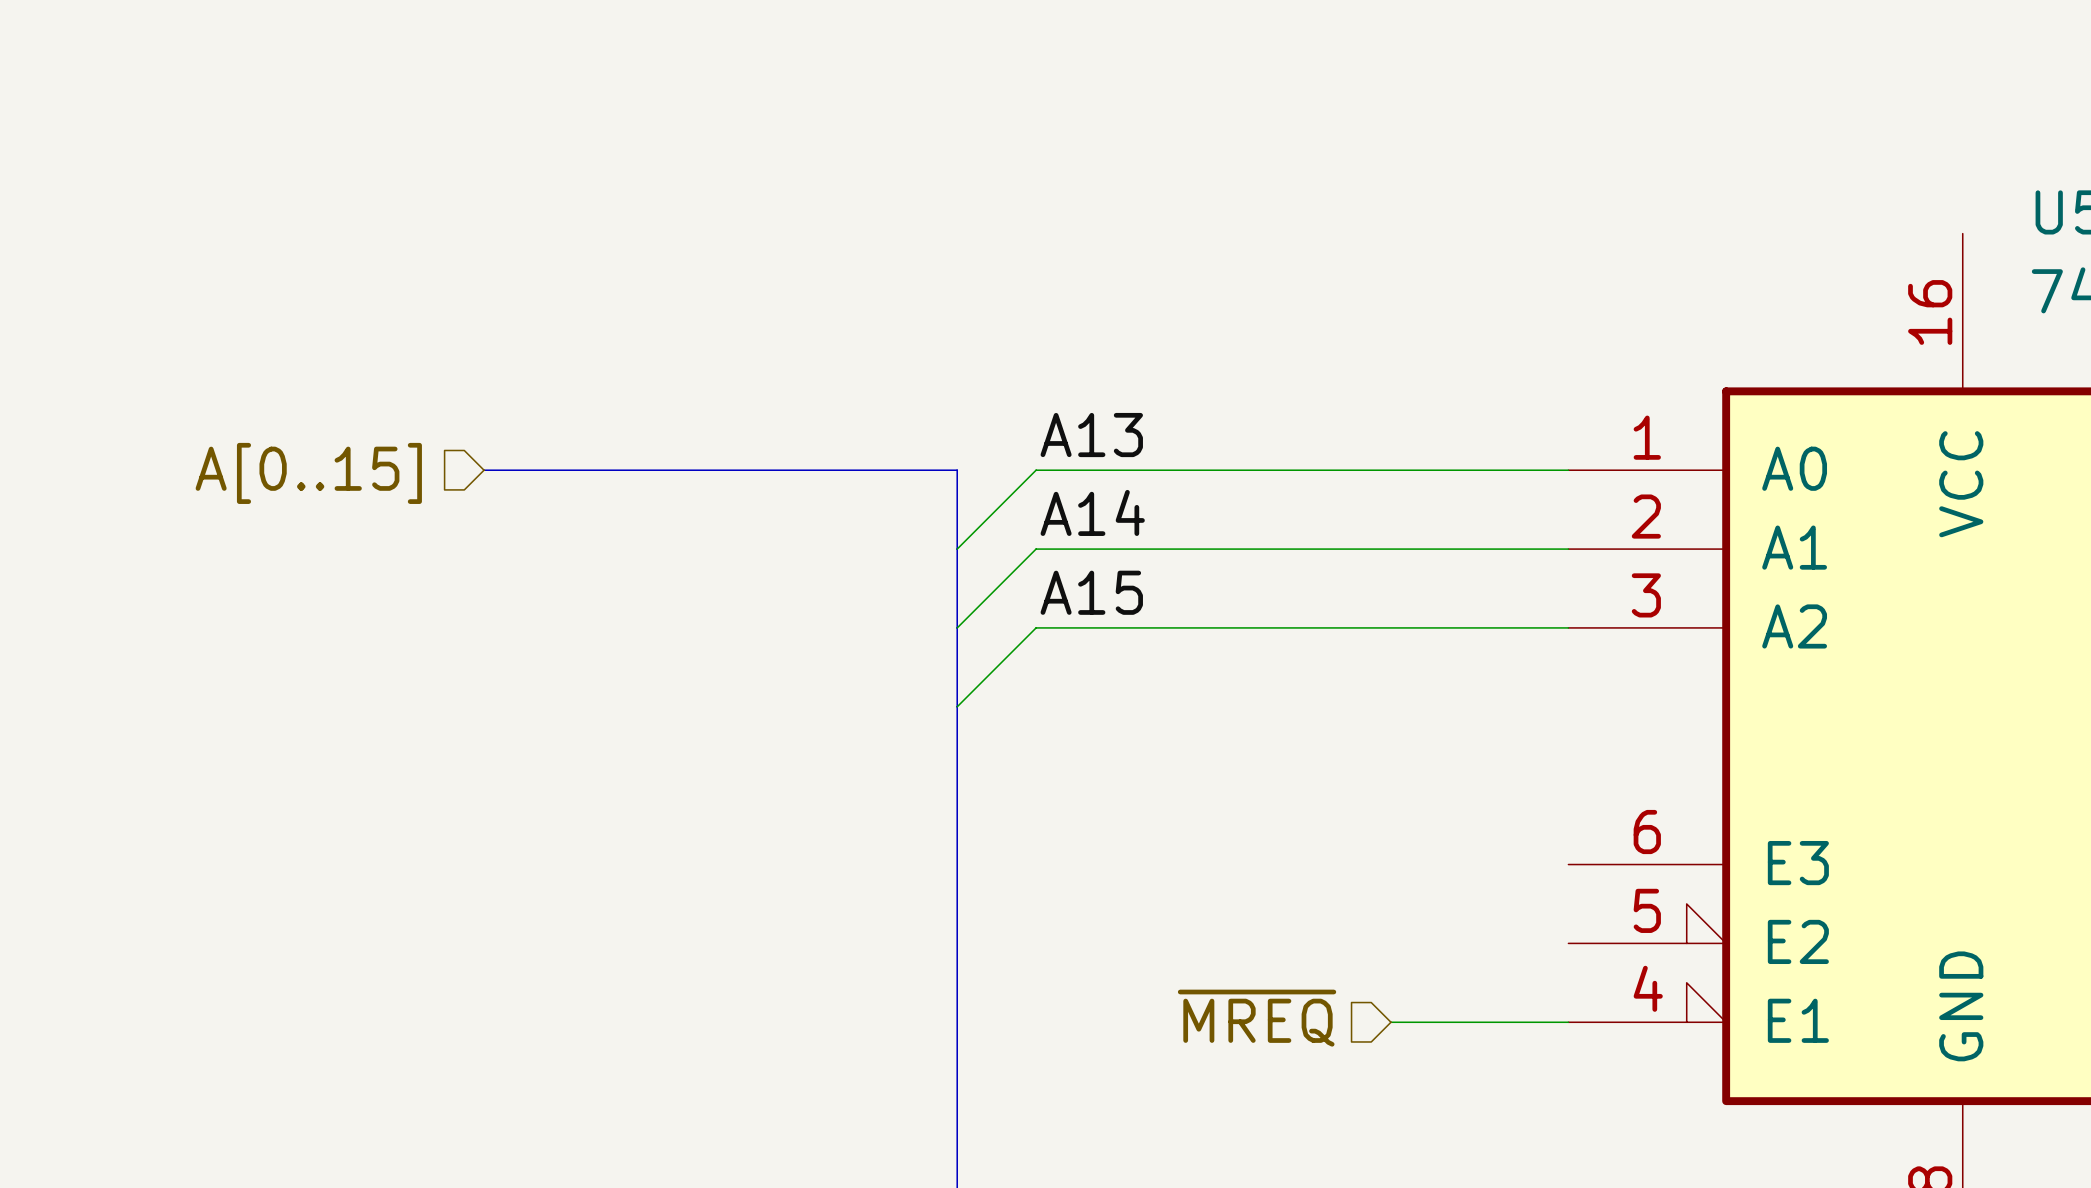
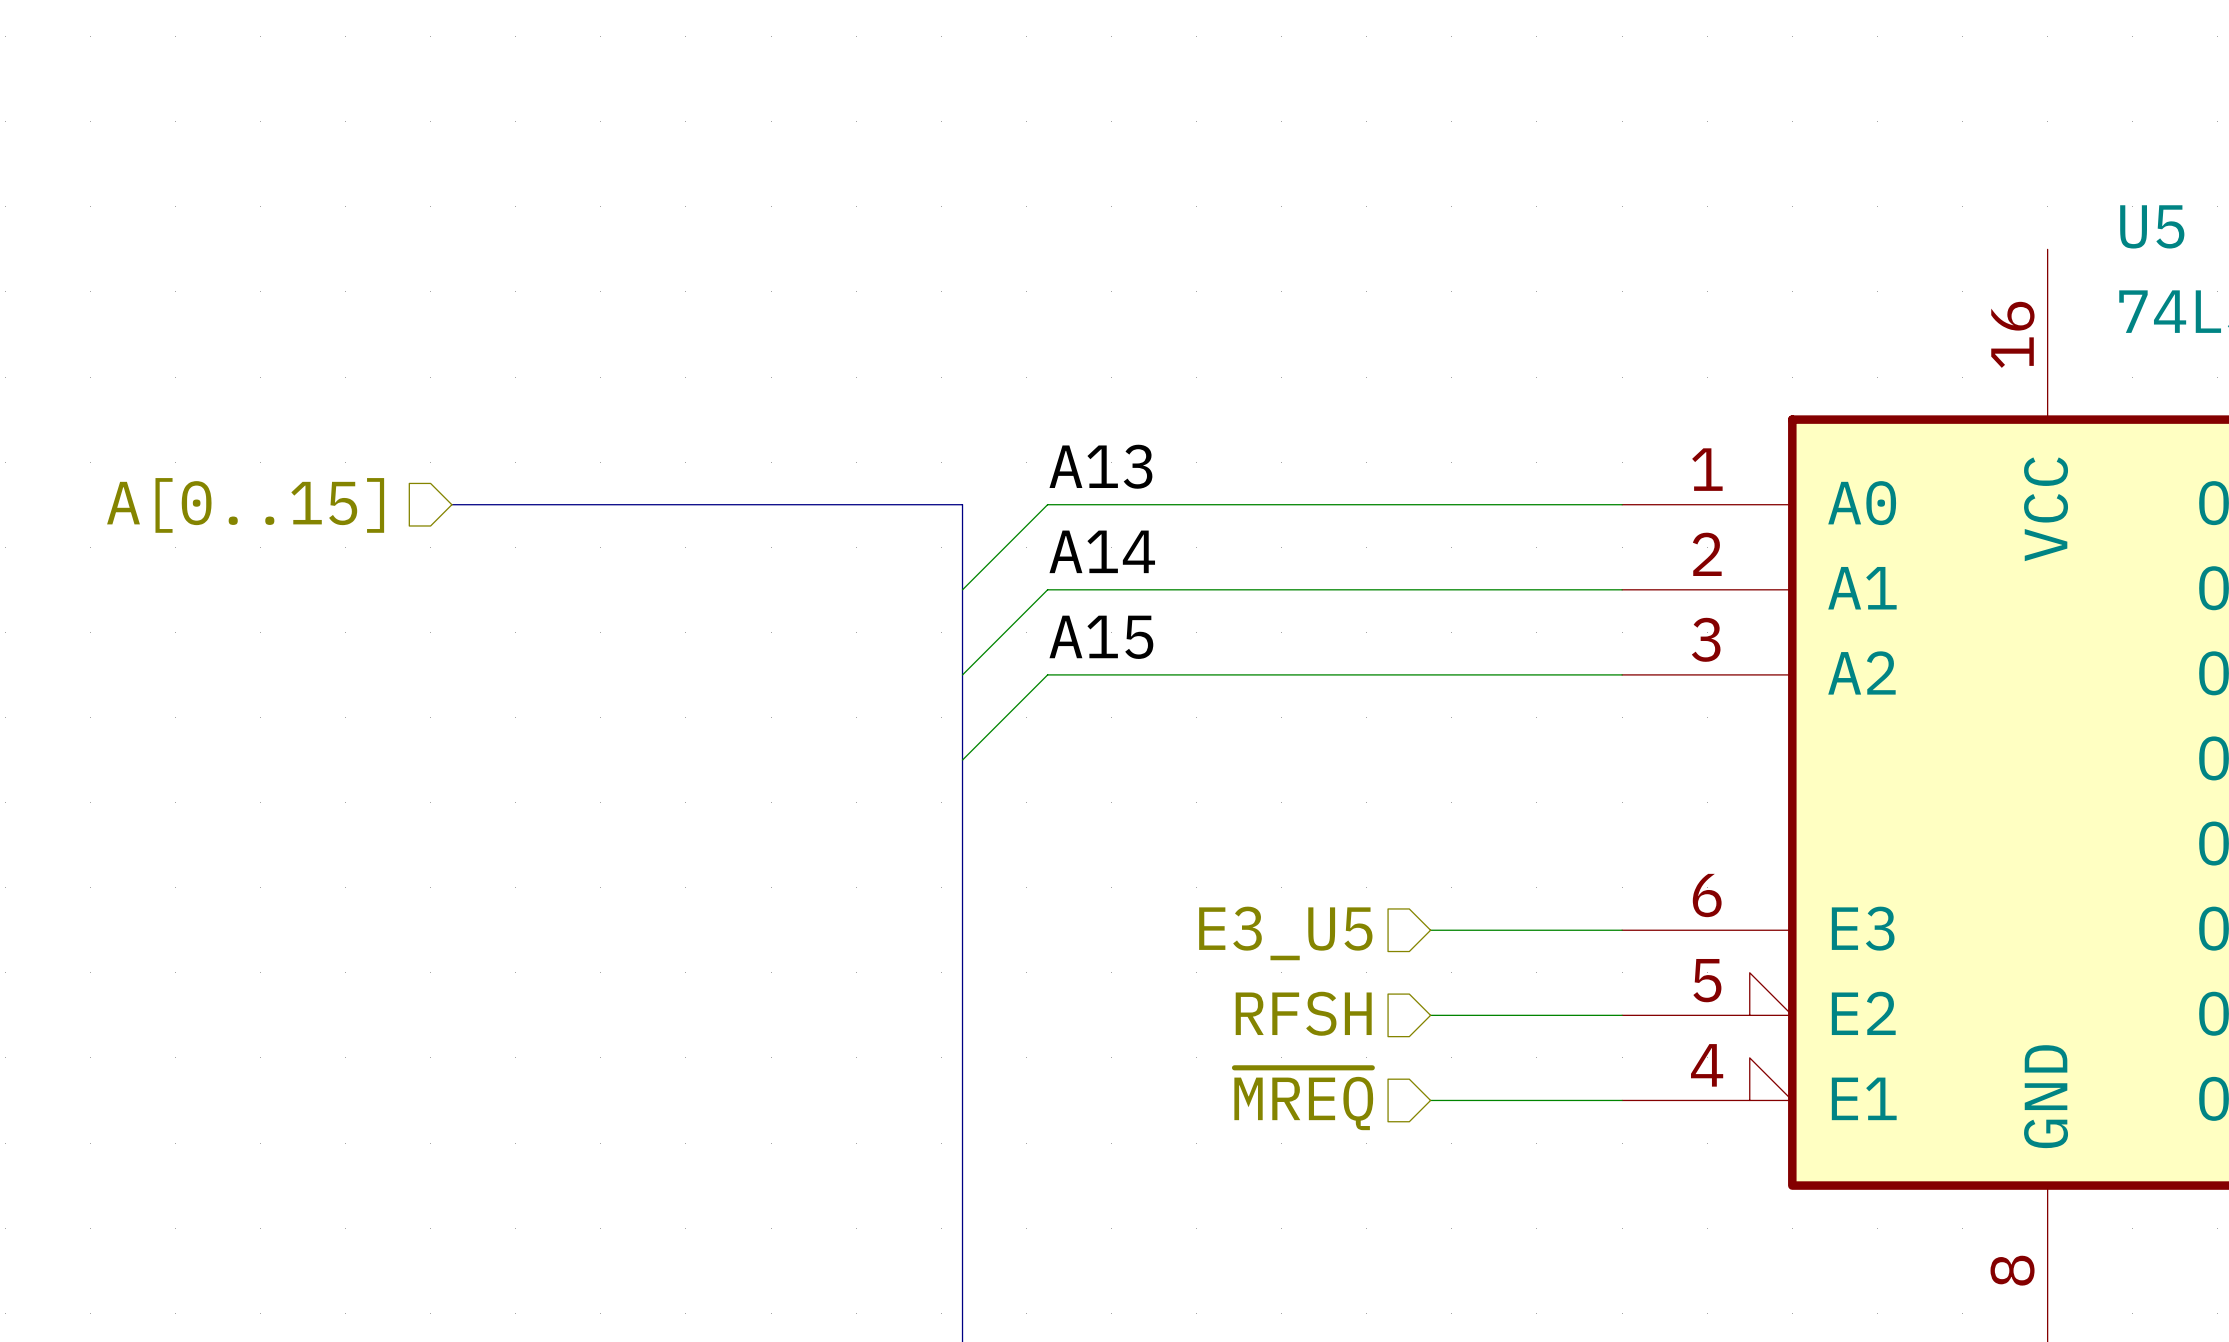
hierarchical label: none -> E3_U5 (1285, 933)
wire: none -> (1430, 930) (1622, 930)
hierarchical label: none -> RFSH (1303, 1013)
wire: none -> (1430, 1015) (1622, 1015)

